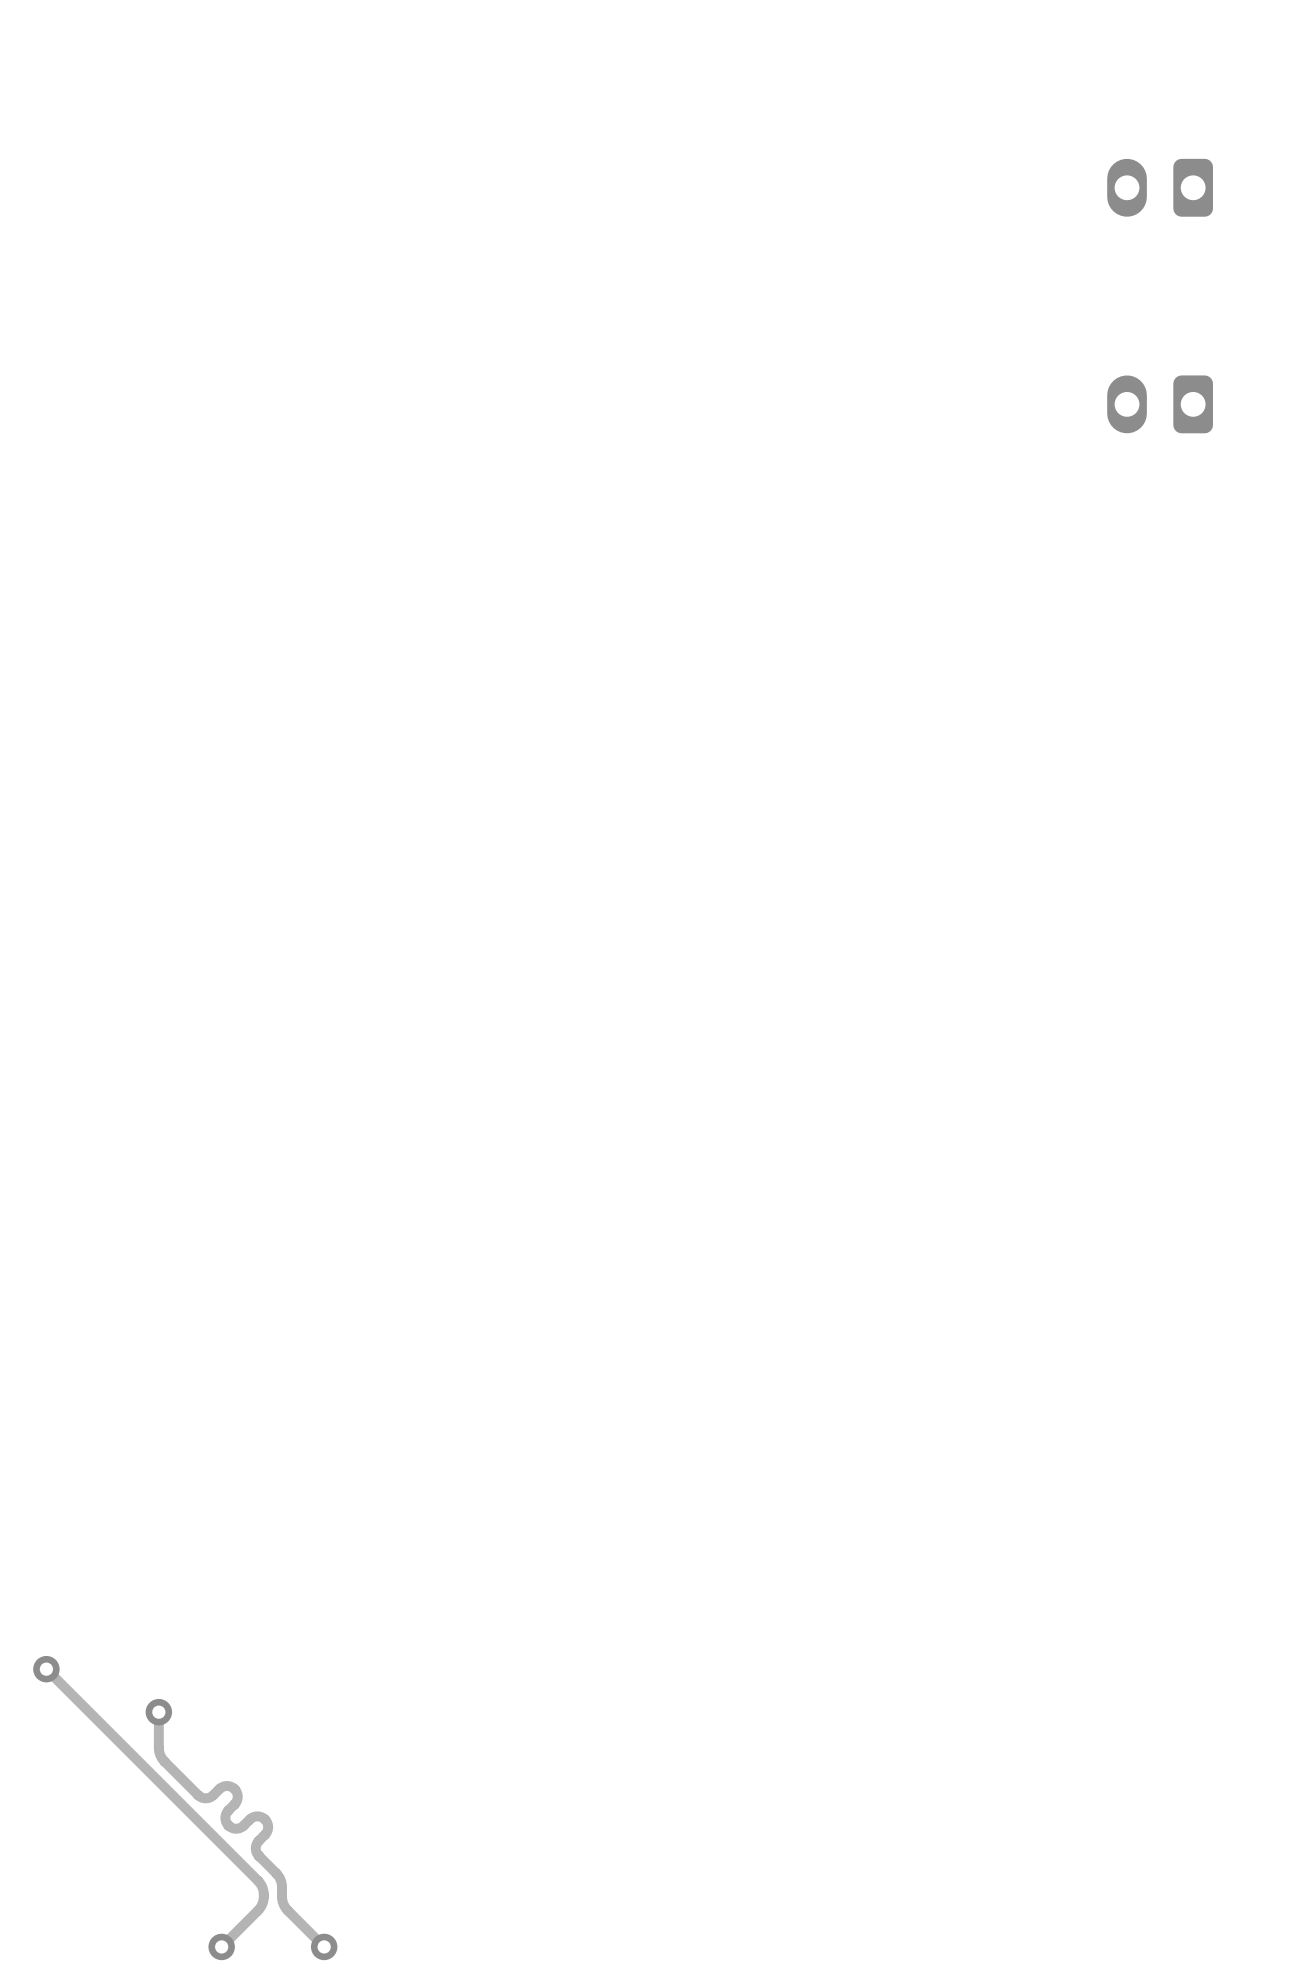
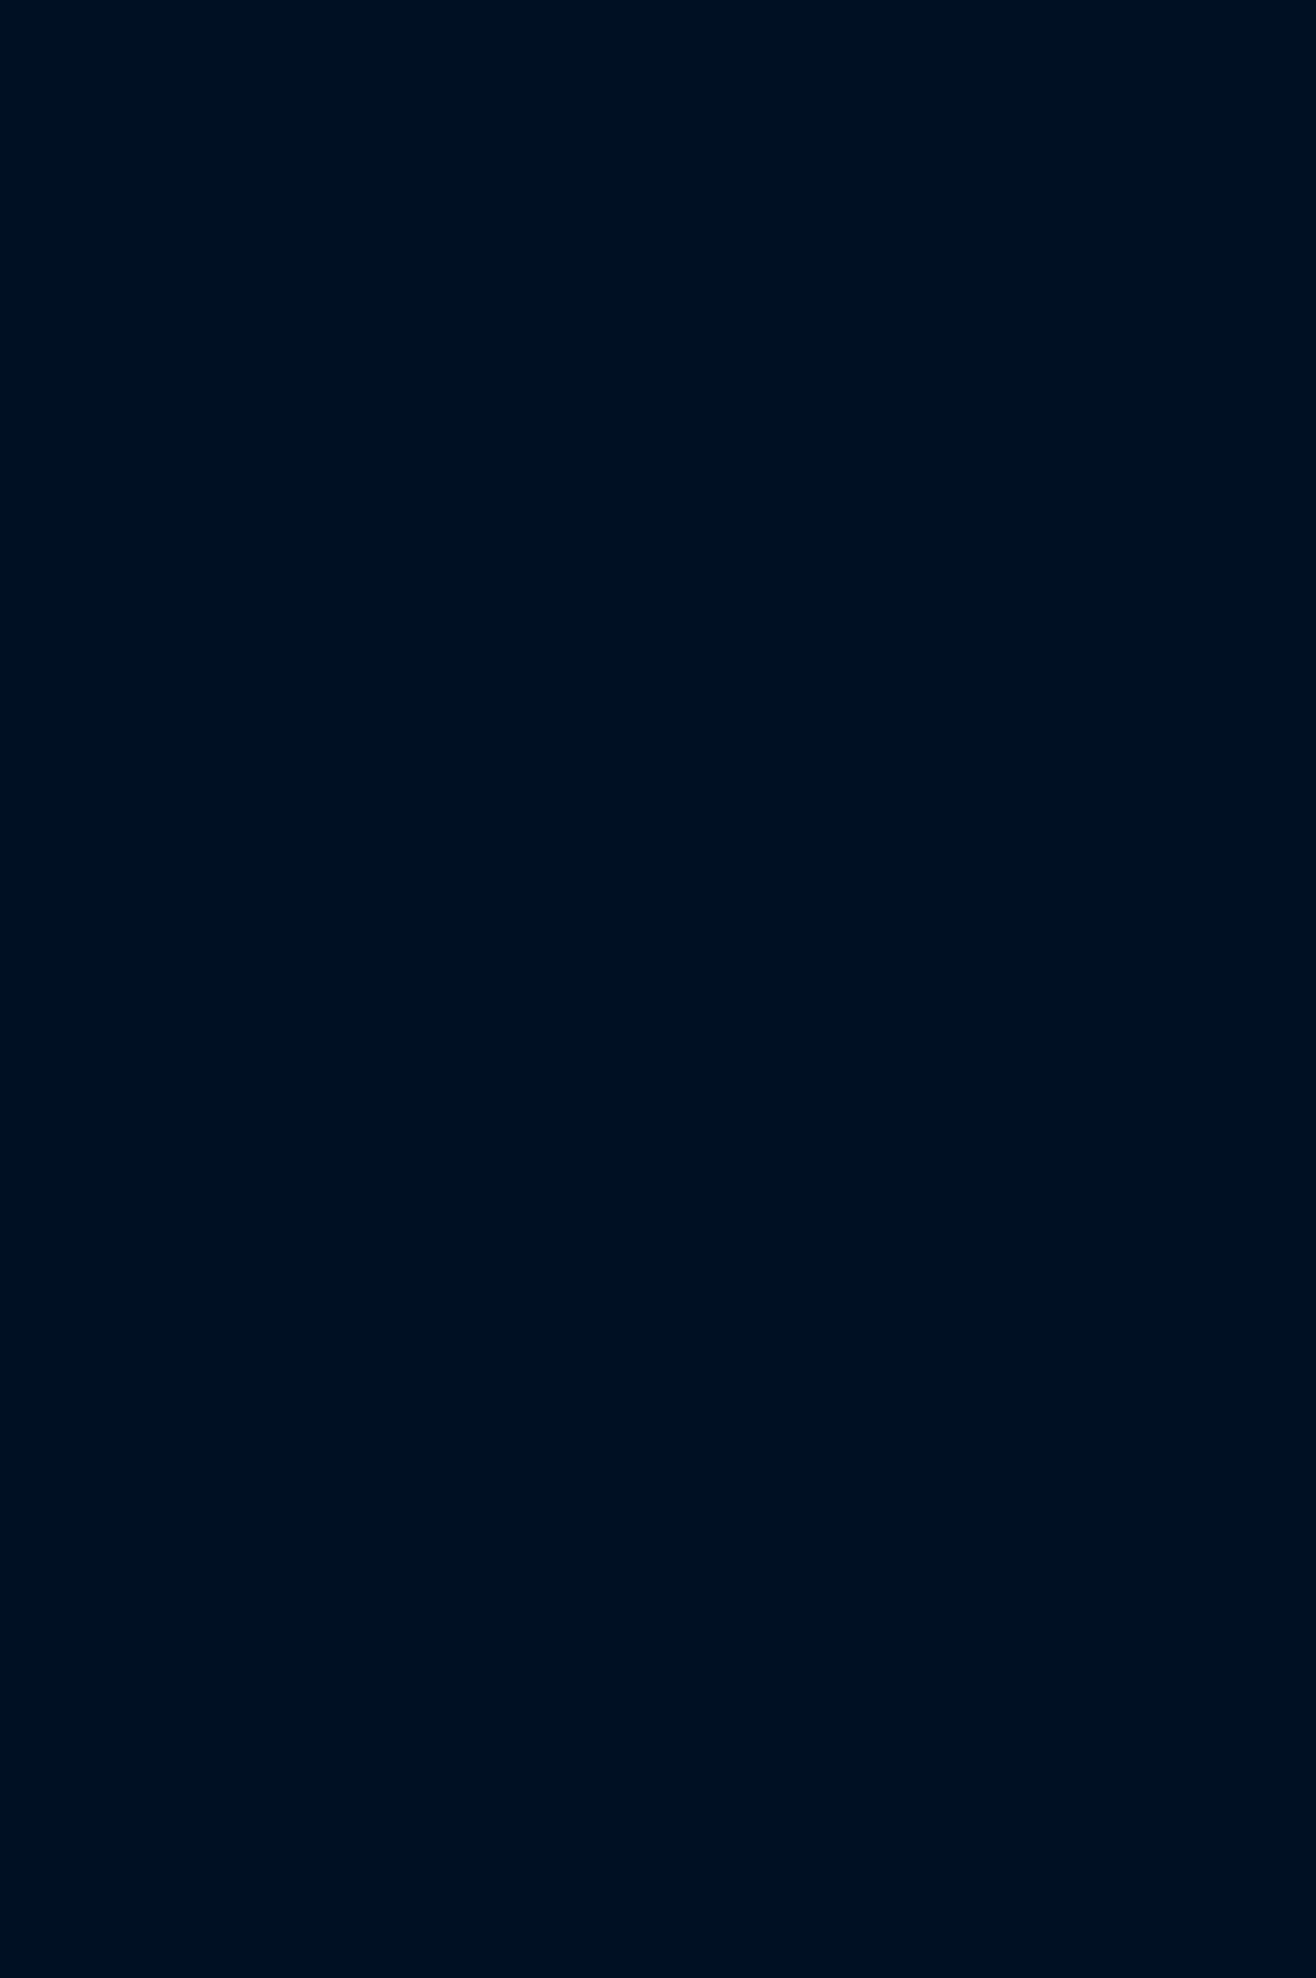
part: (1160, 187) -> none
part: (1160, 404) -> none
track: (46, 1669) (260, 1883) (263, 1894) (260, 1907) (221, 1946) -> none
via: (46, 1669) -> none
track: (158, 1712) (158, 1749) (164, 1761) (201, 1797) (209, 1797) (224, 1786) (234, 1789) (237, 1799) (225, 1816) (226, 1822) (230, 1827) (240, 1827) (255, 1816) (260, 1816) (265, 1820) (267, 1829) (256, 1843) (256, 1853) (279, 1877) (282, 1900) (285, 1907) (324, 1946) -> none
via: (158, 1712) -> none
via: (221, 1946) -> none
via: (324, 1946) -> none

